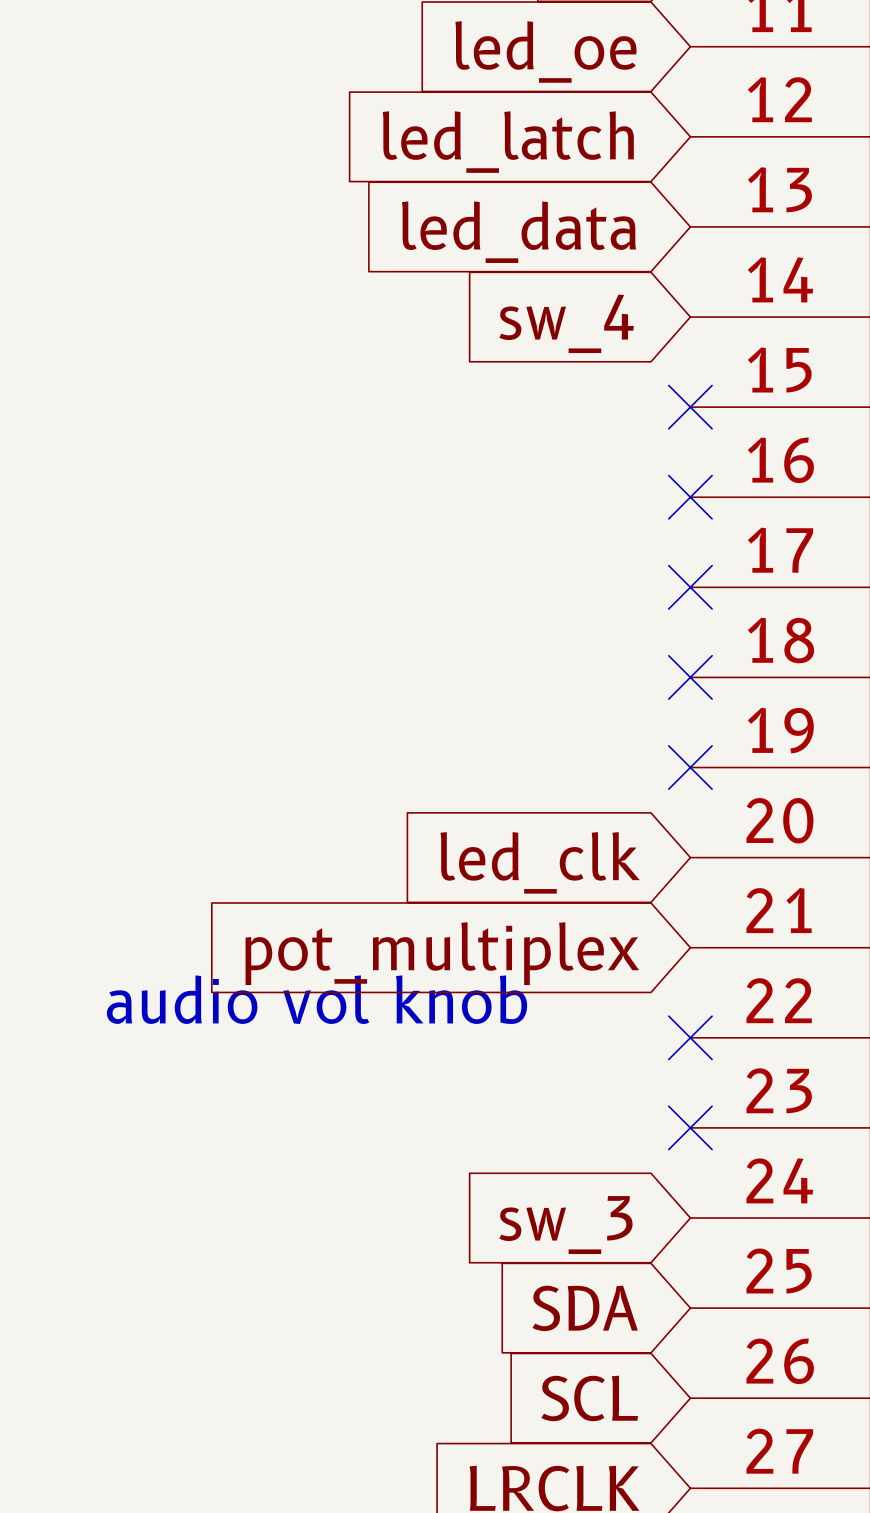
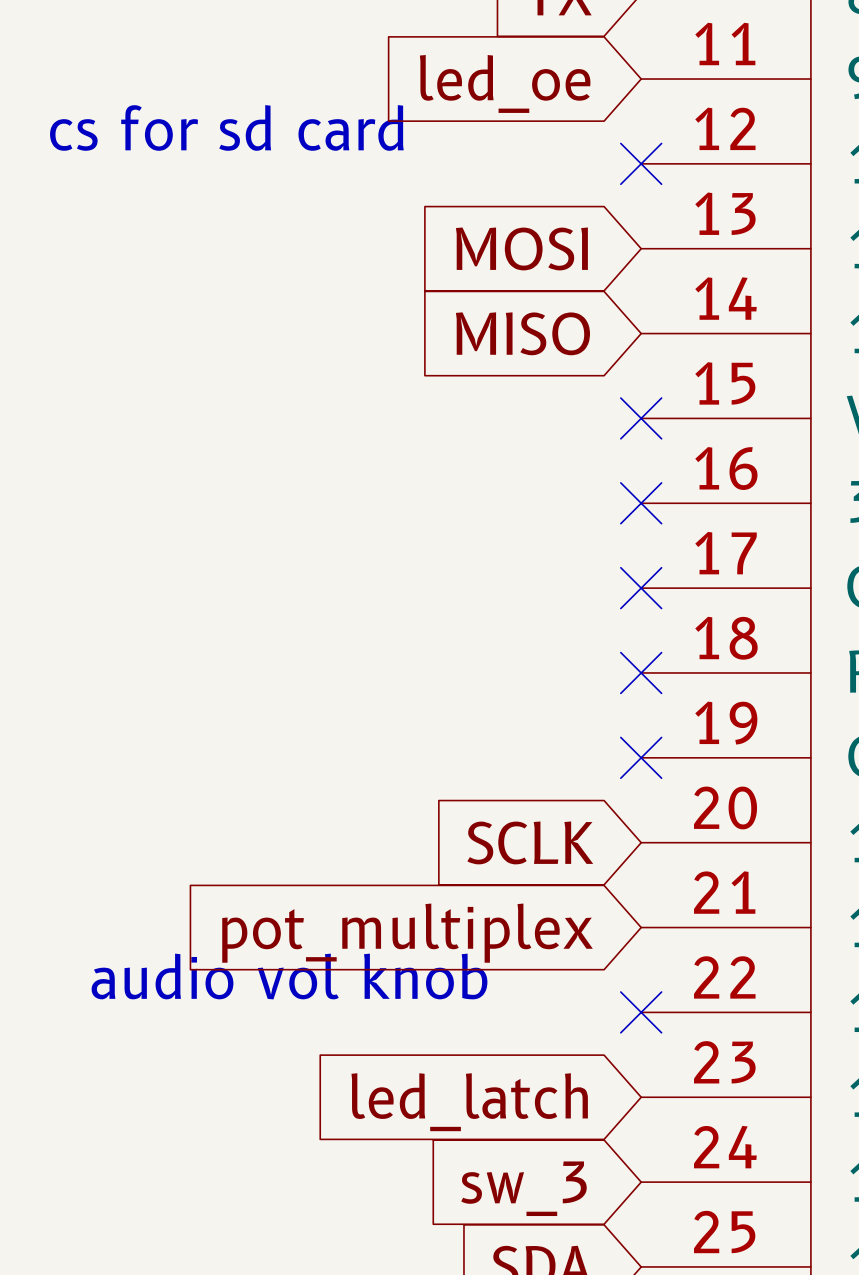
text: none -> cs for sd card (226, 127)
no-connect mark: none -> (641, 163)
global label: led_latch (508, 142) -> none
global label: led_data (518, 232) -> MOSI (521, 248)
global label: sw_4 (566, 323) -> MISO (522, 333)
global label: led_clk (540, 862) -> SCLK (530, 842)
no-connect mark: (690, 1127) -> none
global label: none -> led_latch (469, 1102)

